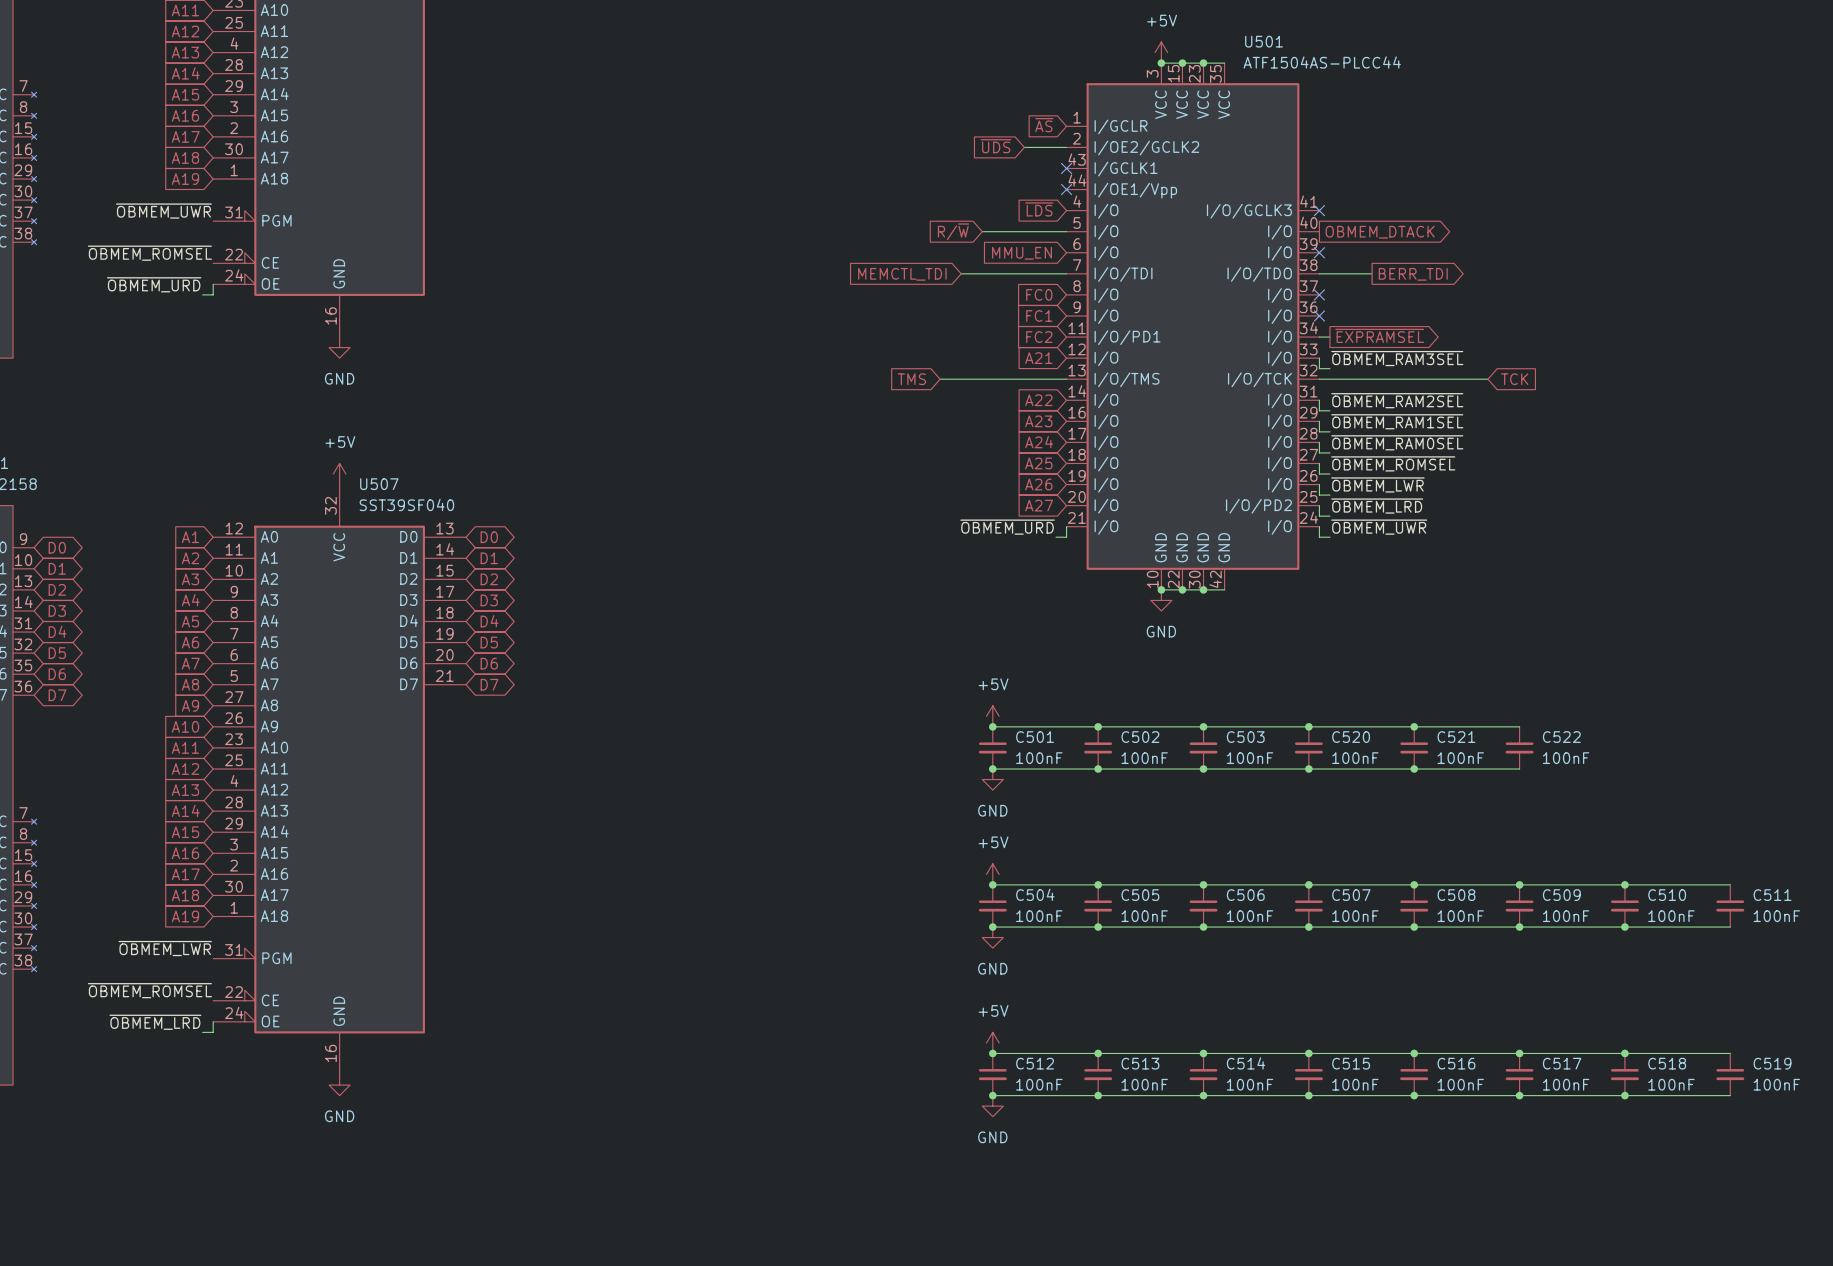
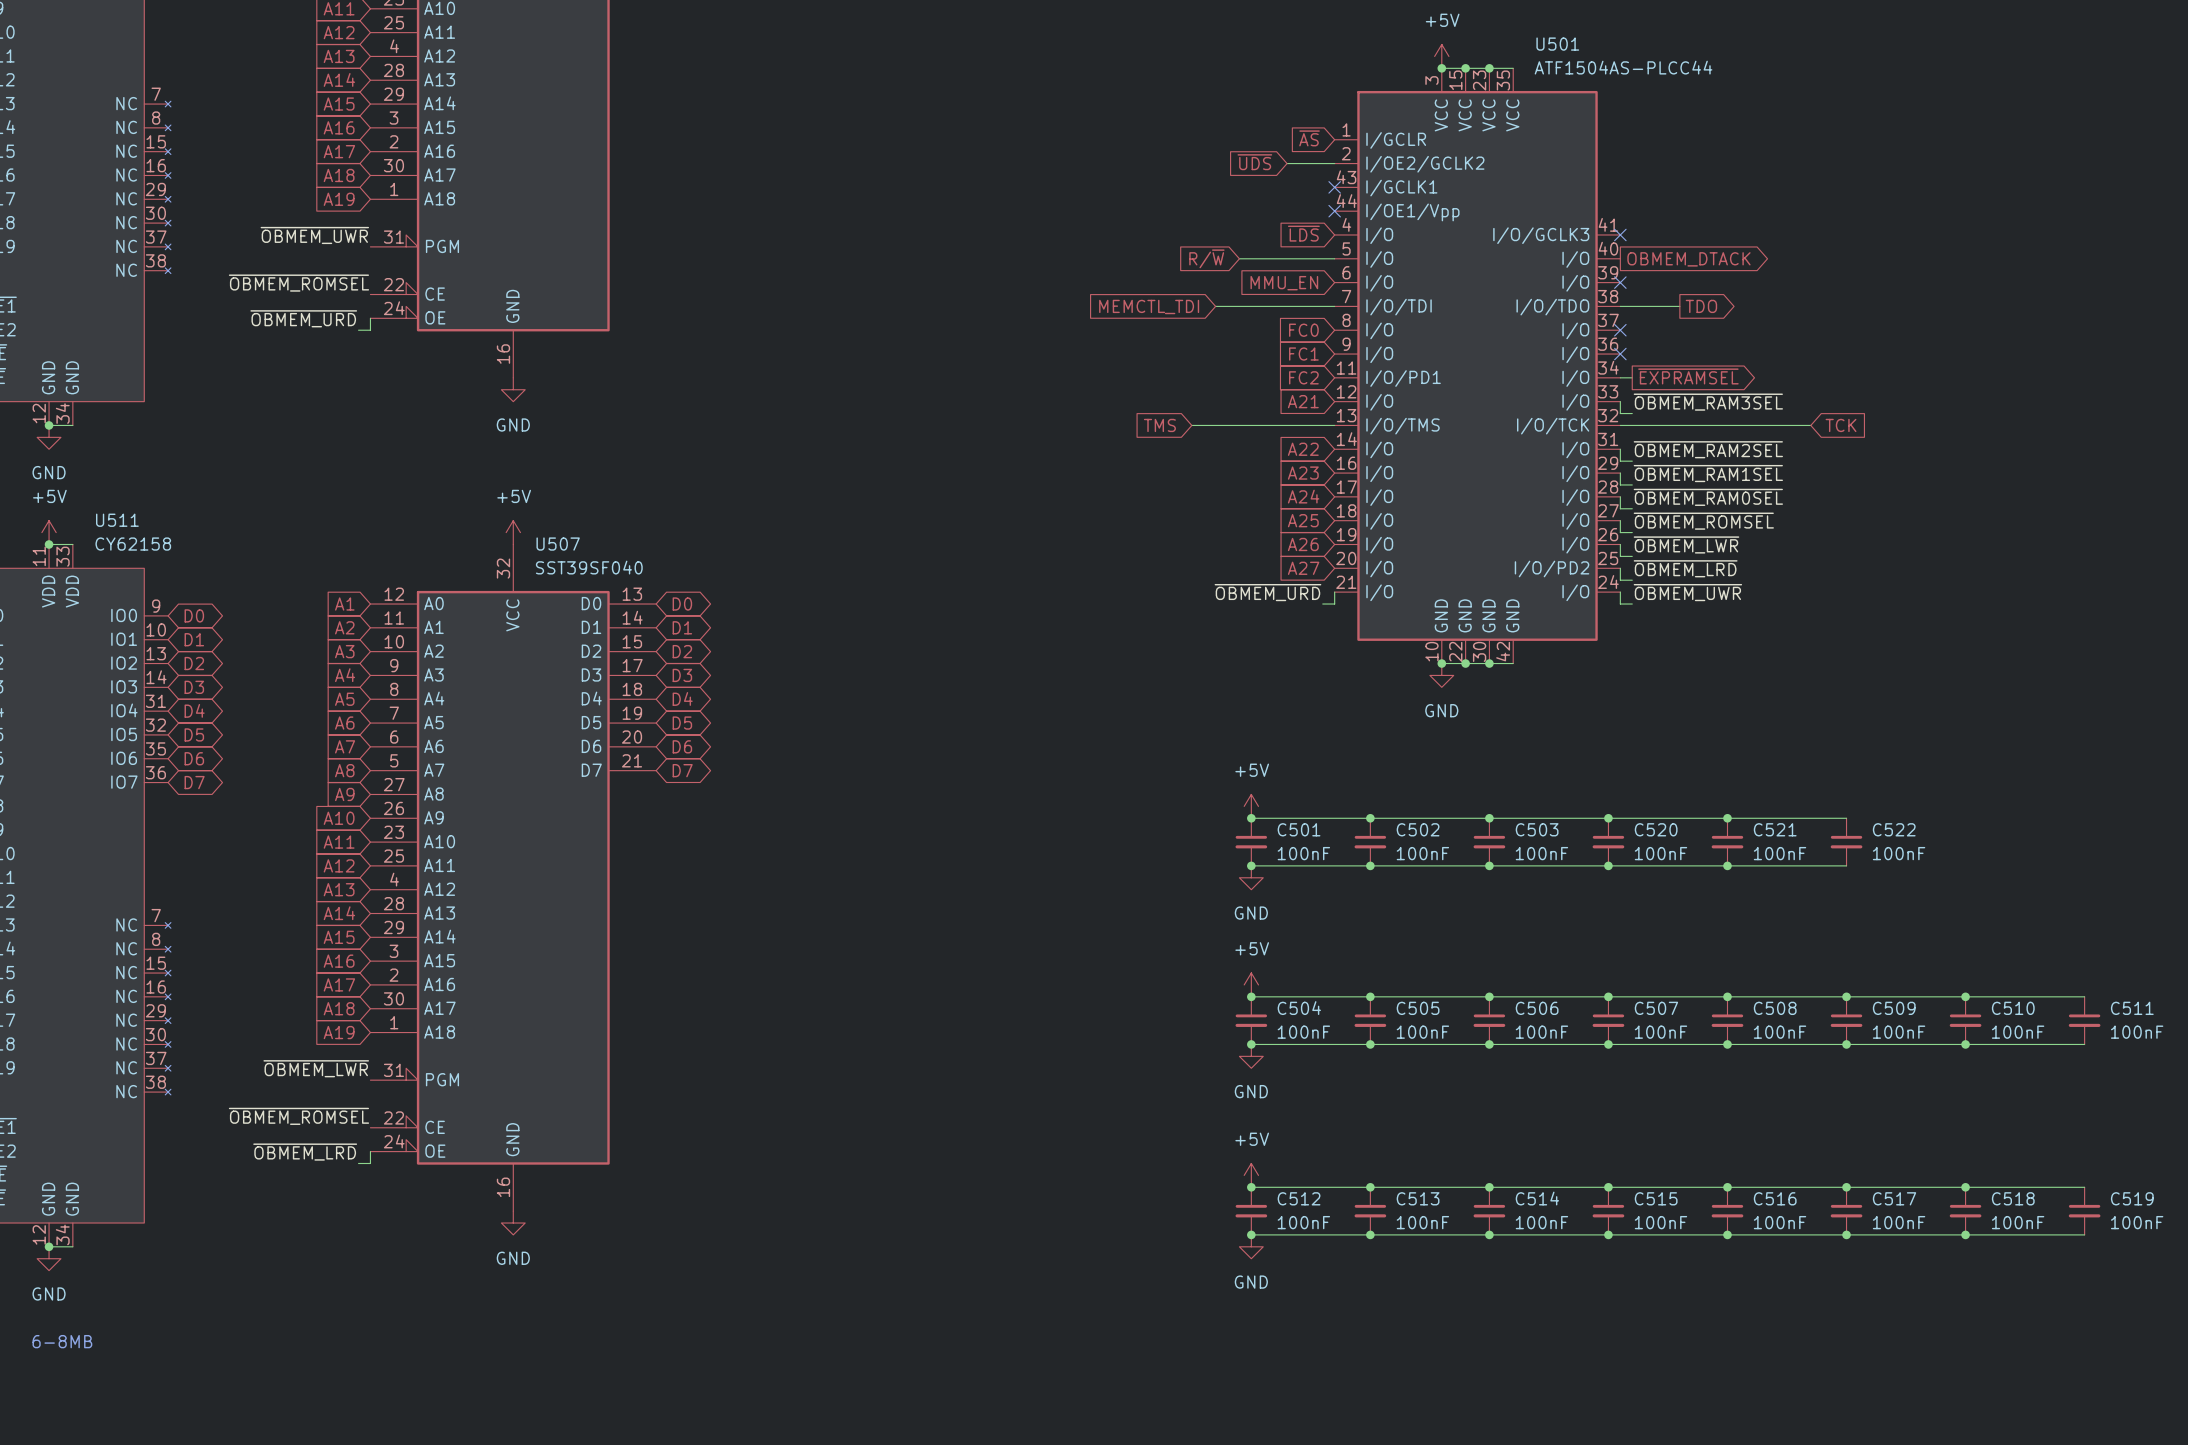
global label: BERR_TDI (1413, 274) -> TDO (1701, 306)

